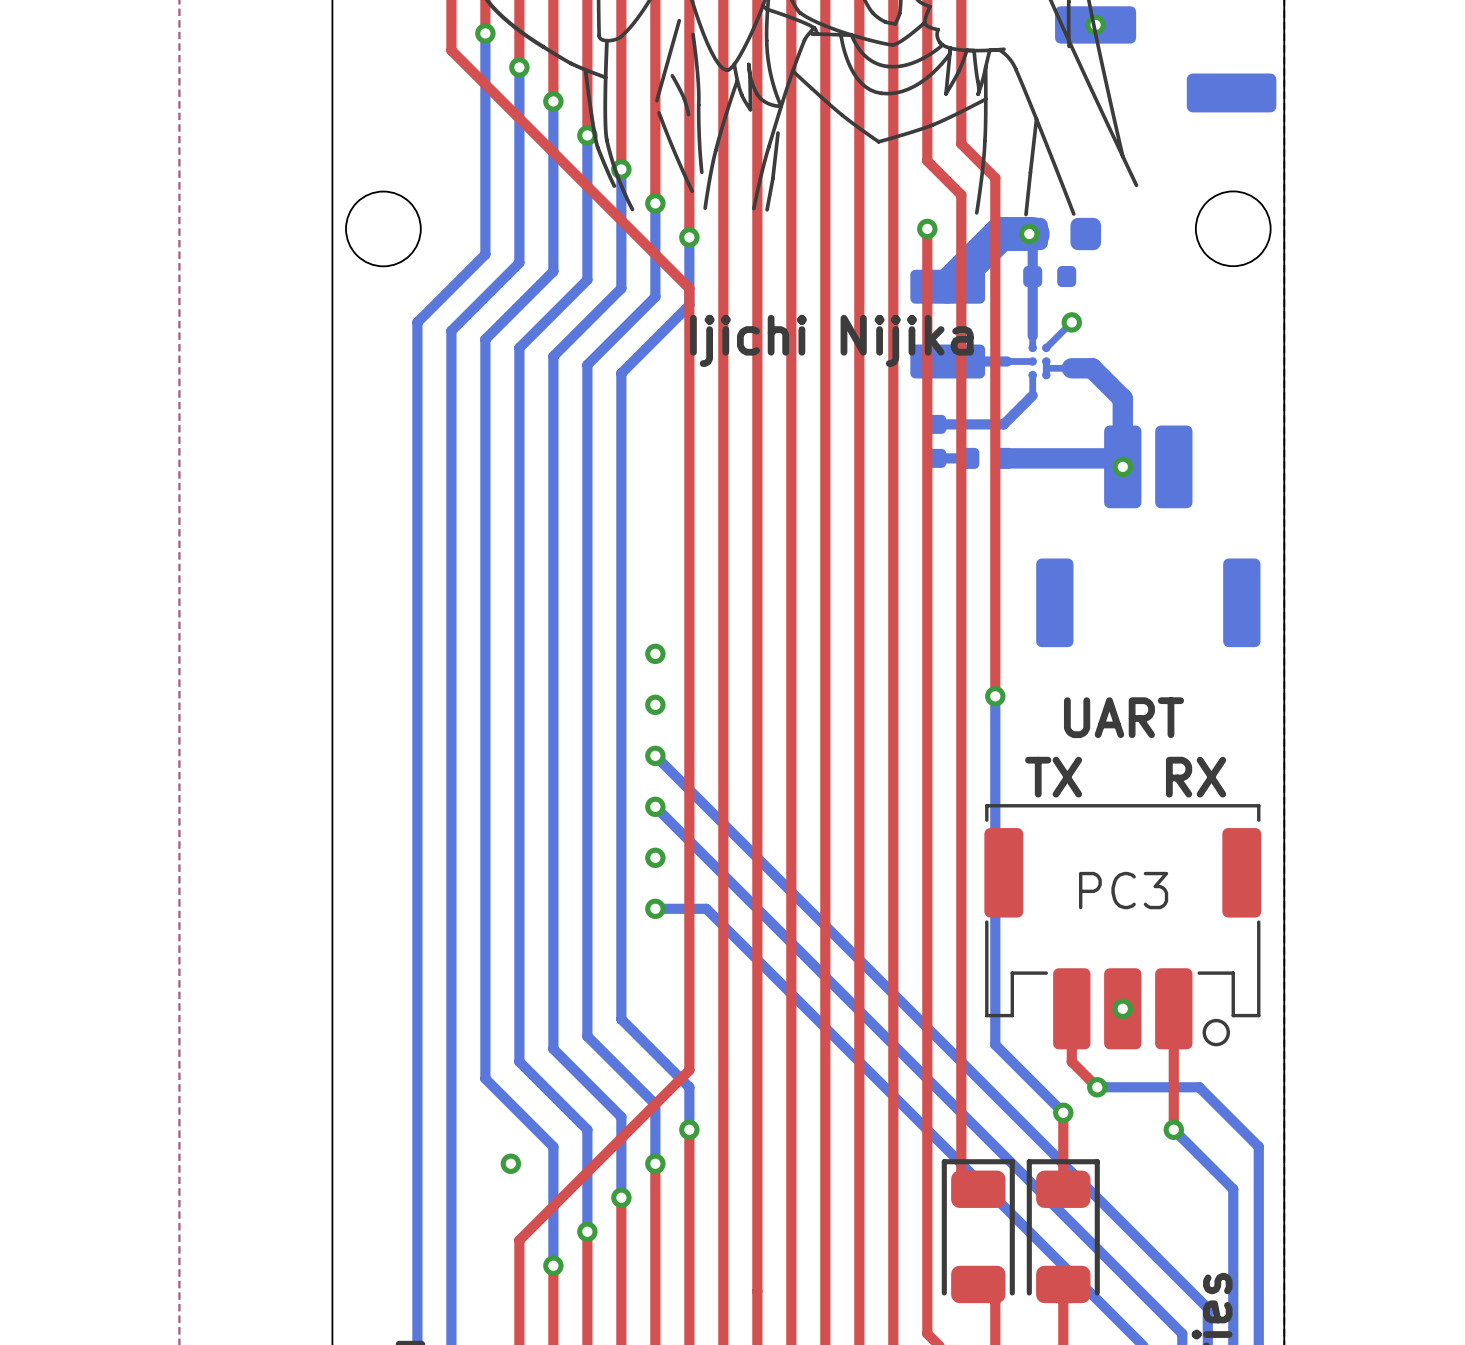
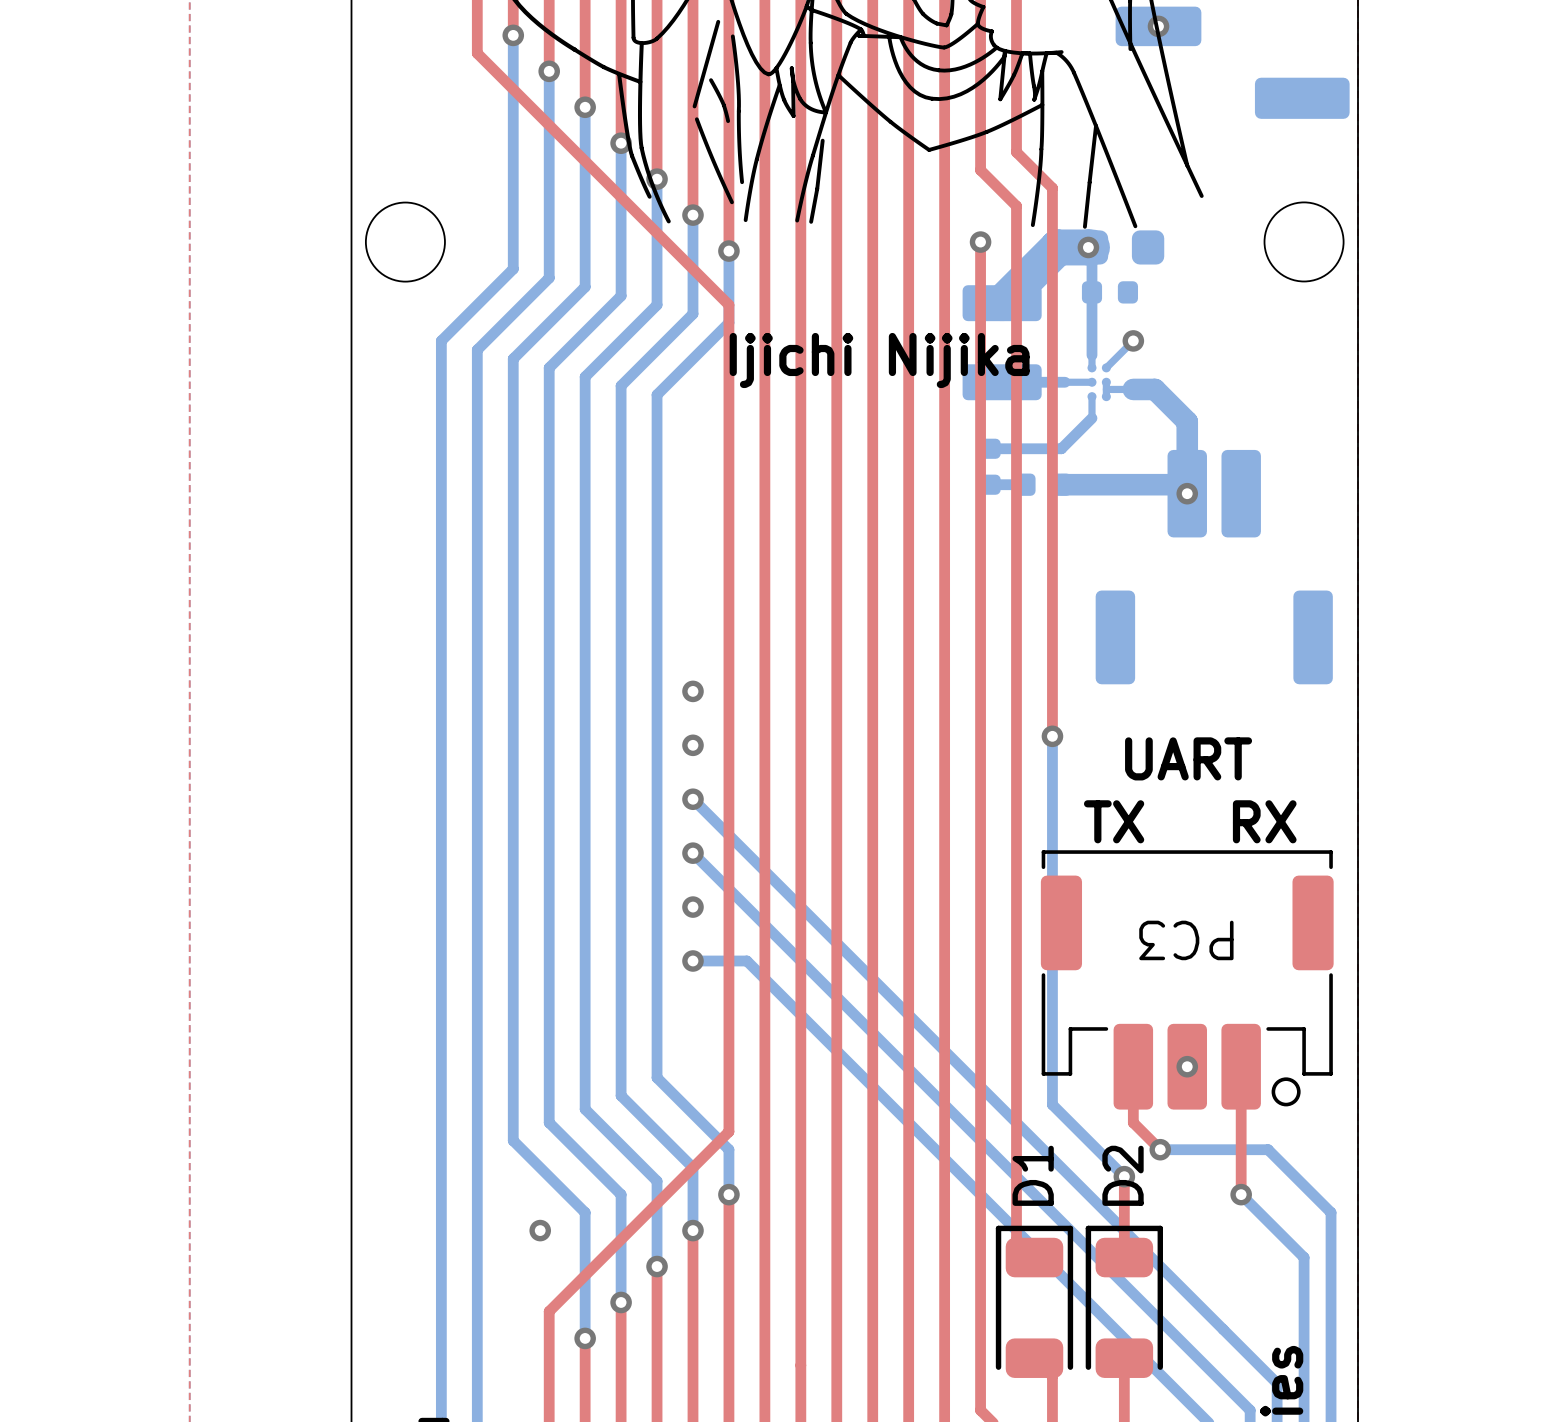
PC3 name rotation: 0° (1123, 890) -> 180° (1186, 940)
D1 name: none -> D1 (1033, 1175)
D2 name: none -> D2 (1123, 1175)

